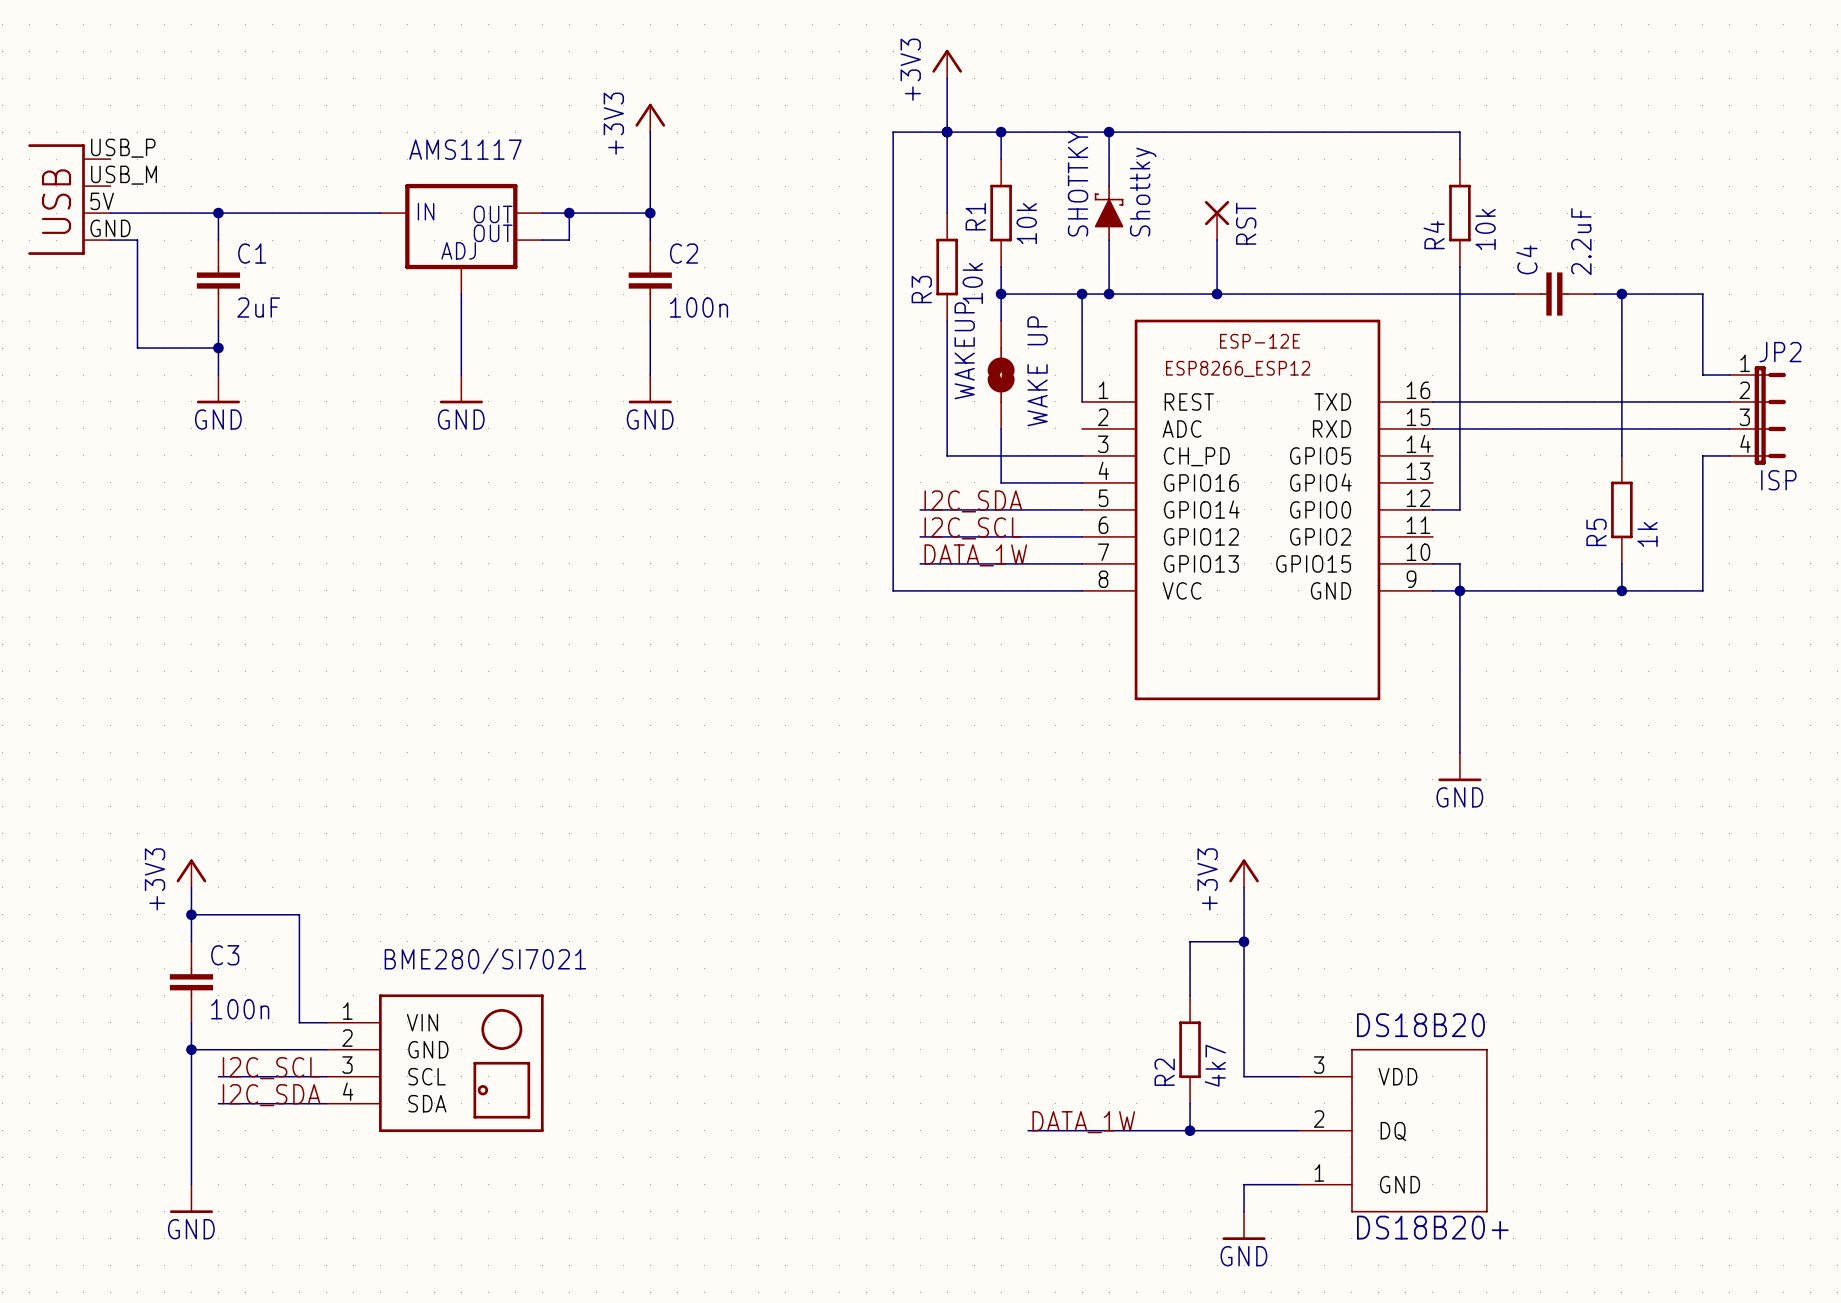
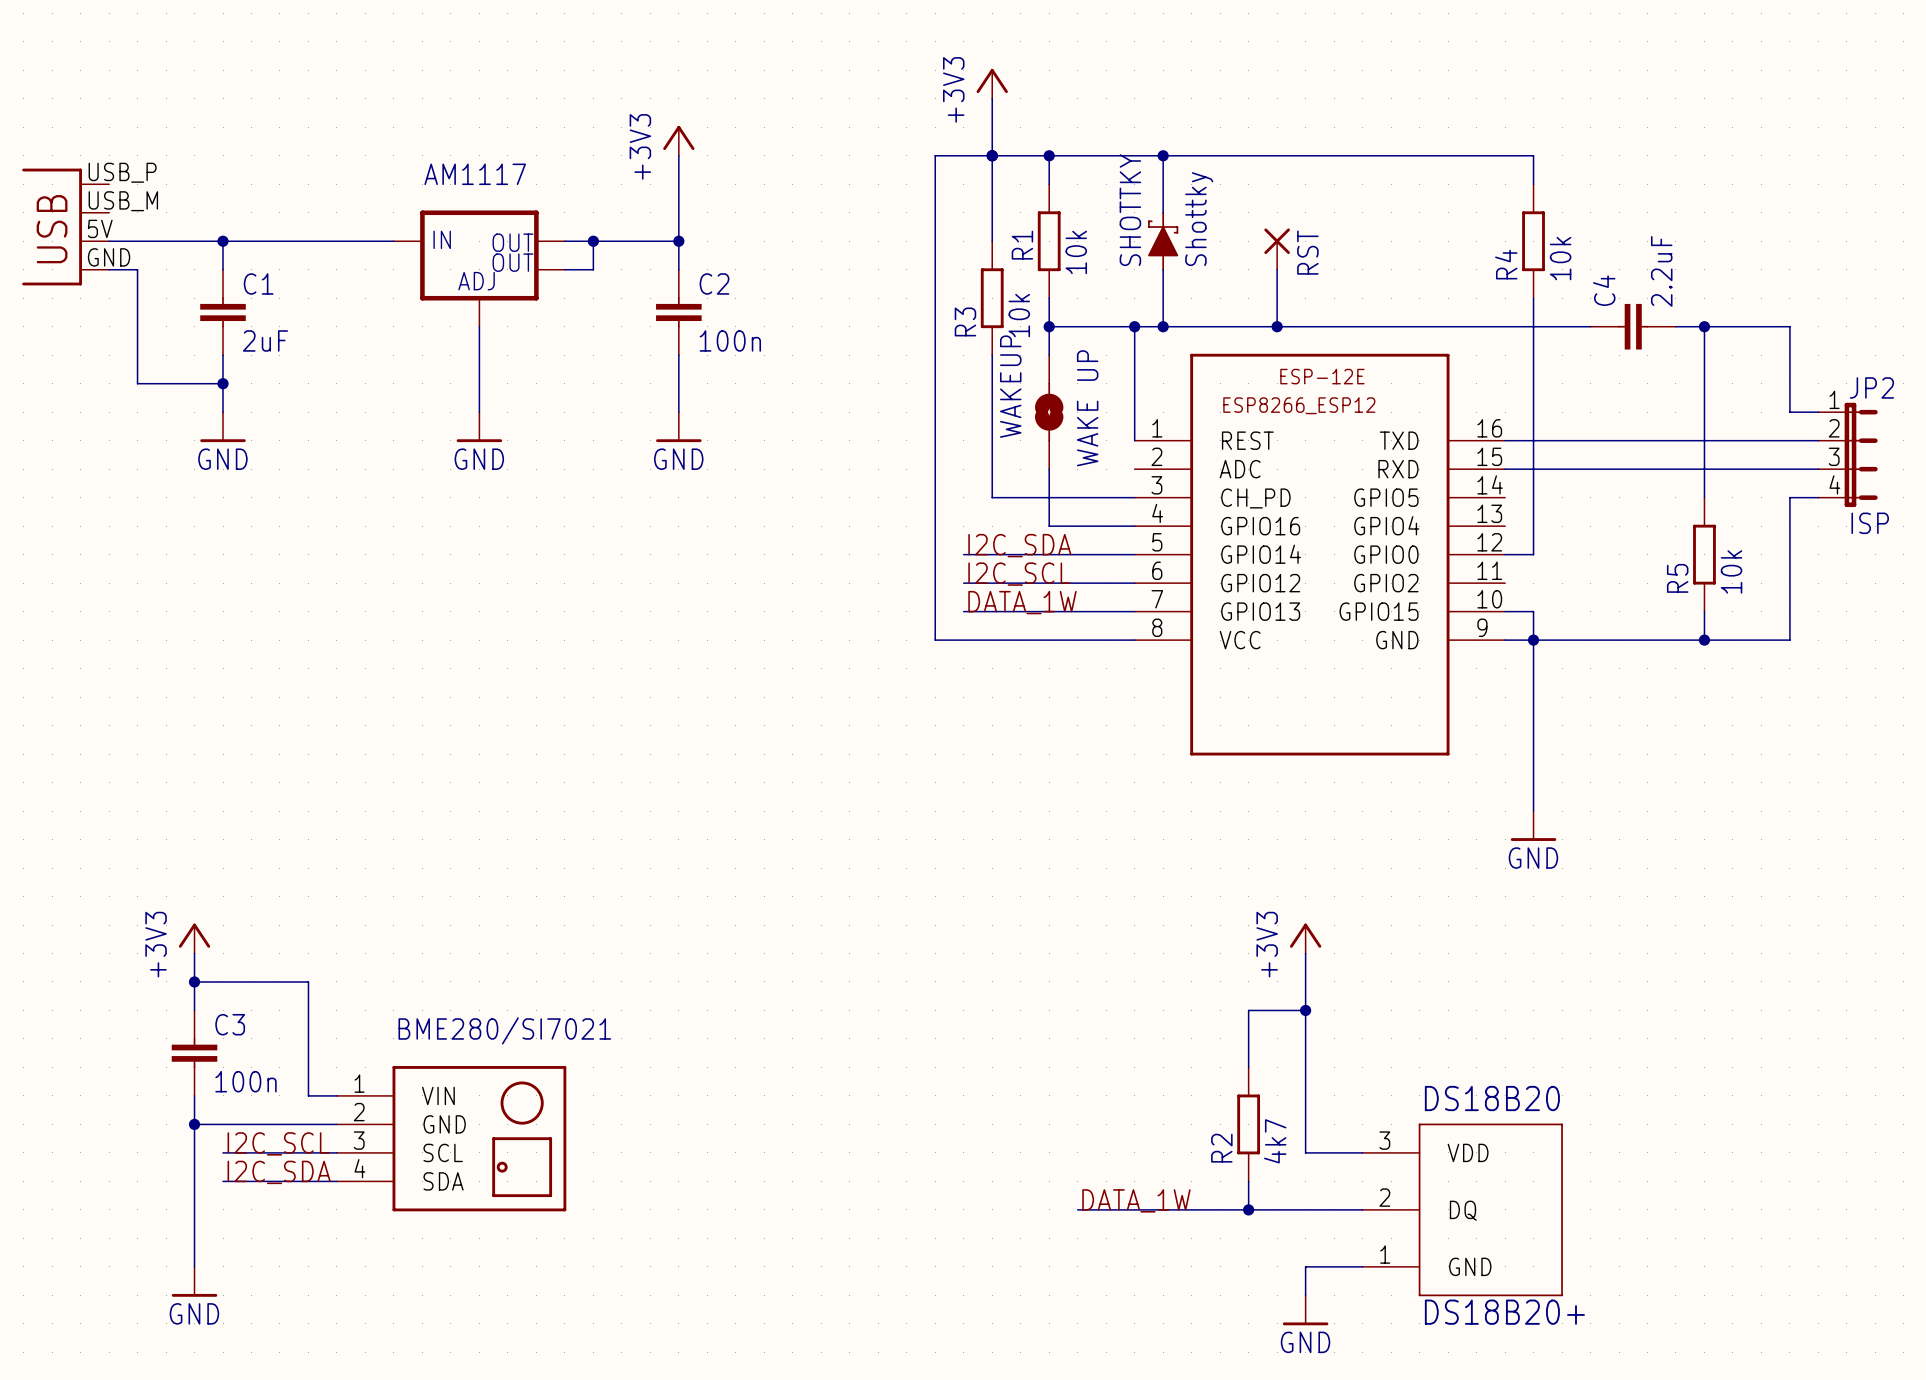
AMS1117 name: AMS1117 (465, 149) -> AM1117 (475, 174)
R5 value: 1k (1647, 534) -> 10k (1731, 571)

